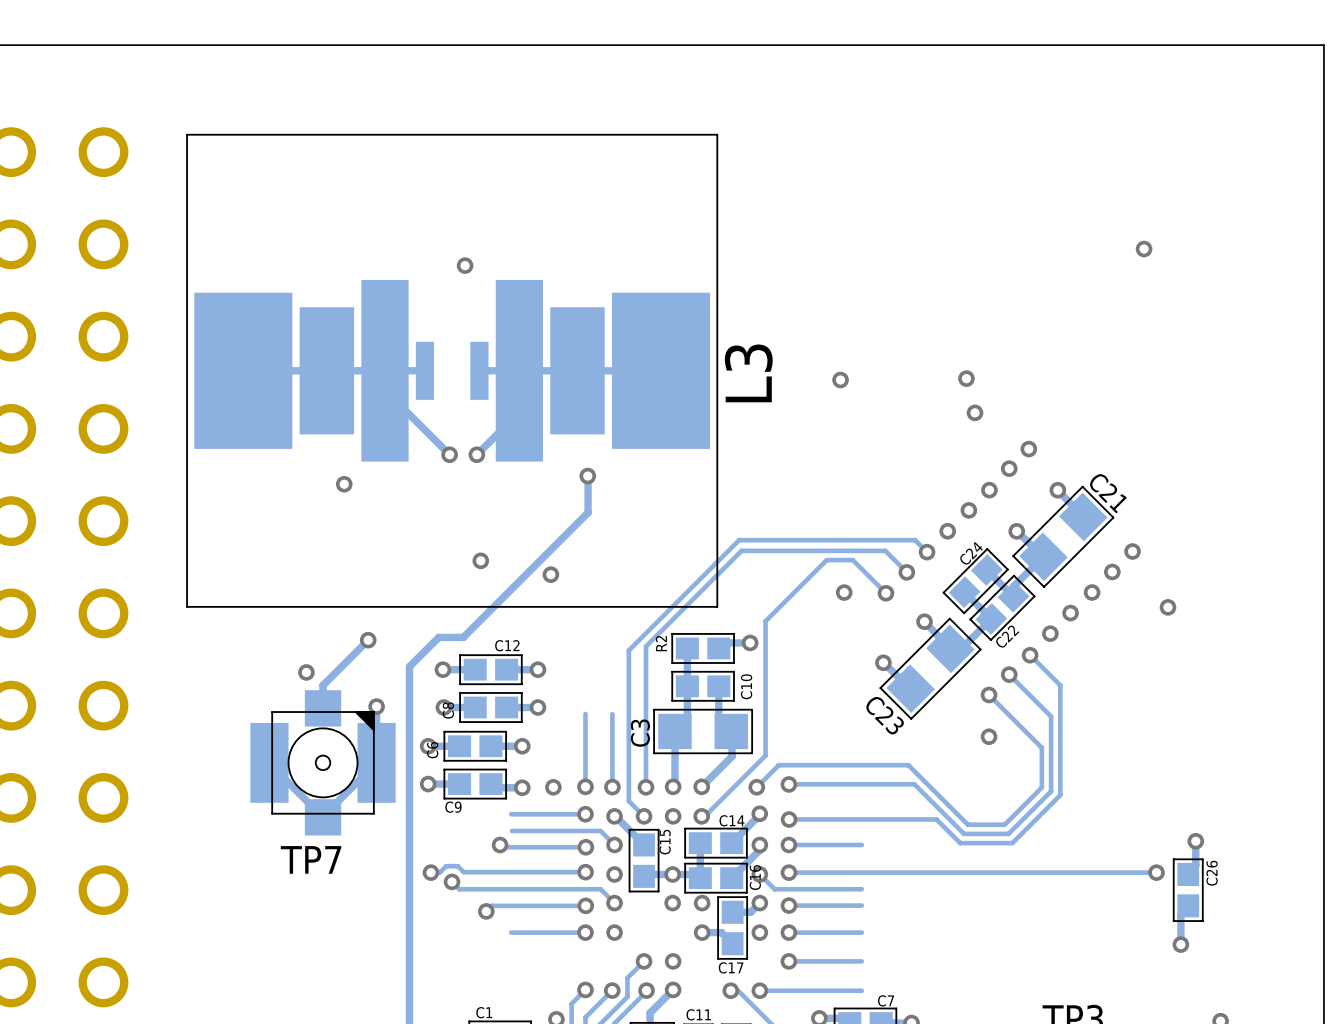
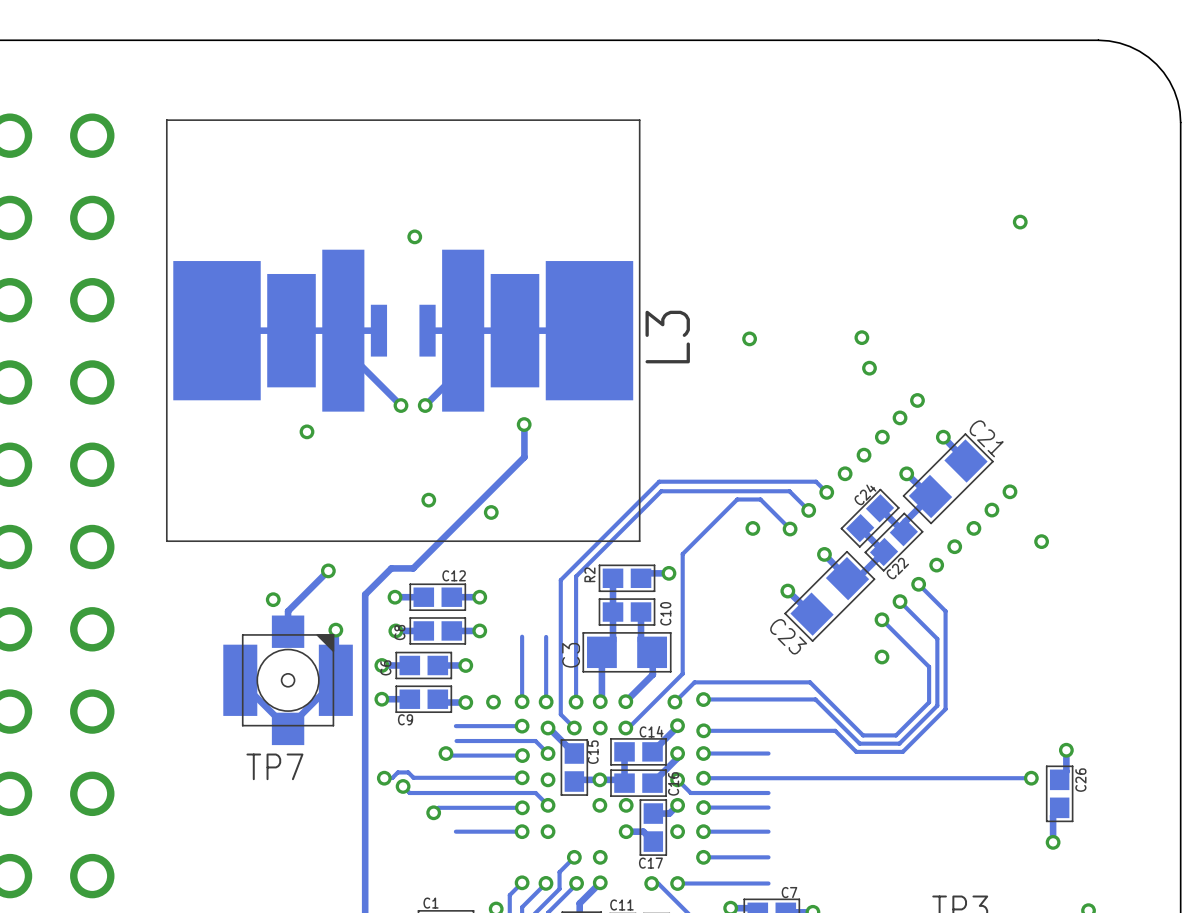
board edge: (1231, 45) (1323, 45) (1323, 137) -> (1098, 40) (1129, 46) (1156, 64) (1174, 91) (1180, 122)

